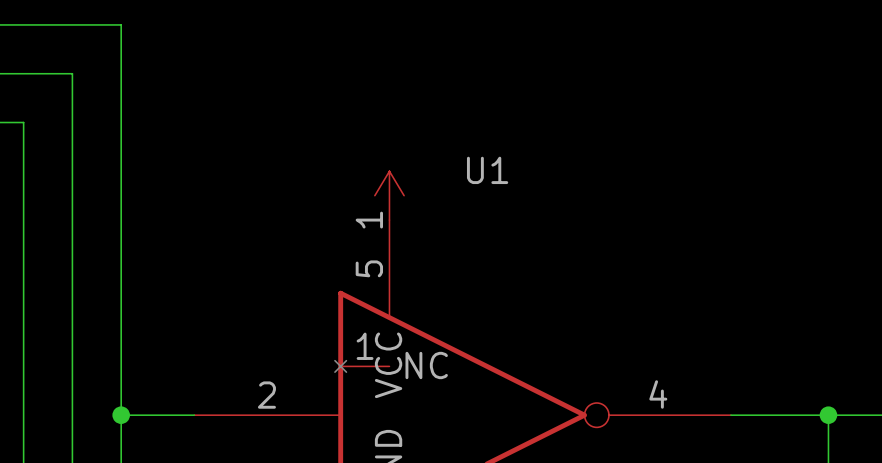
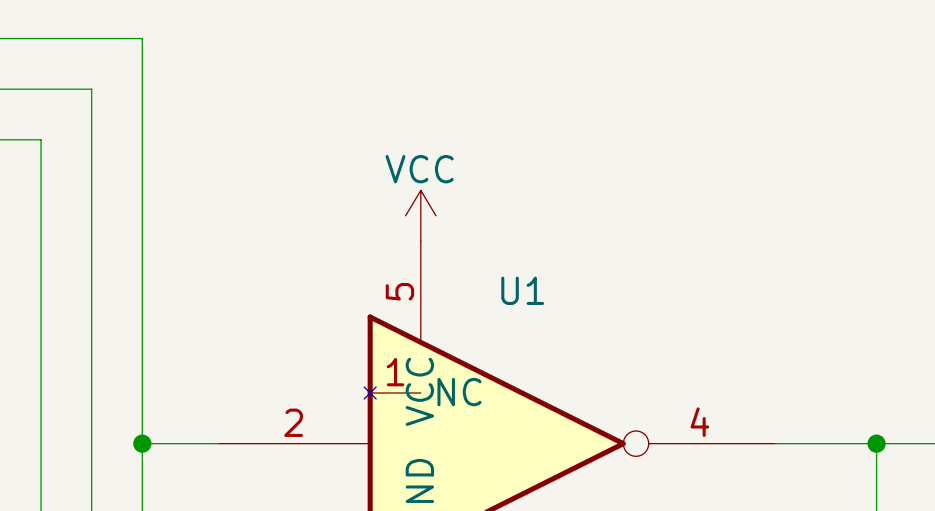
power symbol text: none -> VCC (419, 169)
U1 name position: U1 (487, 170) -> U1 (522, 290)
power symbol pin number: 1 (369, 220) -> none

